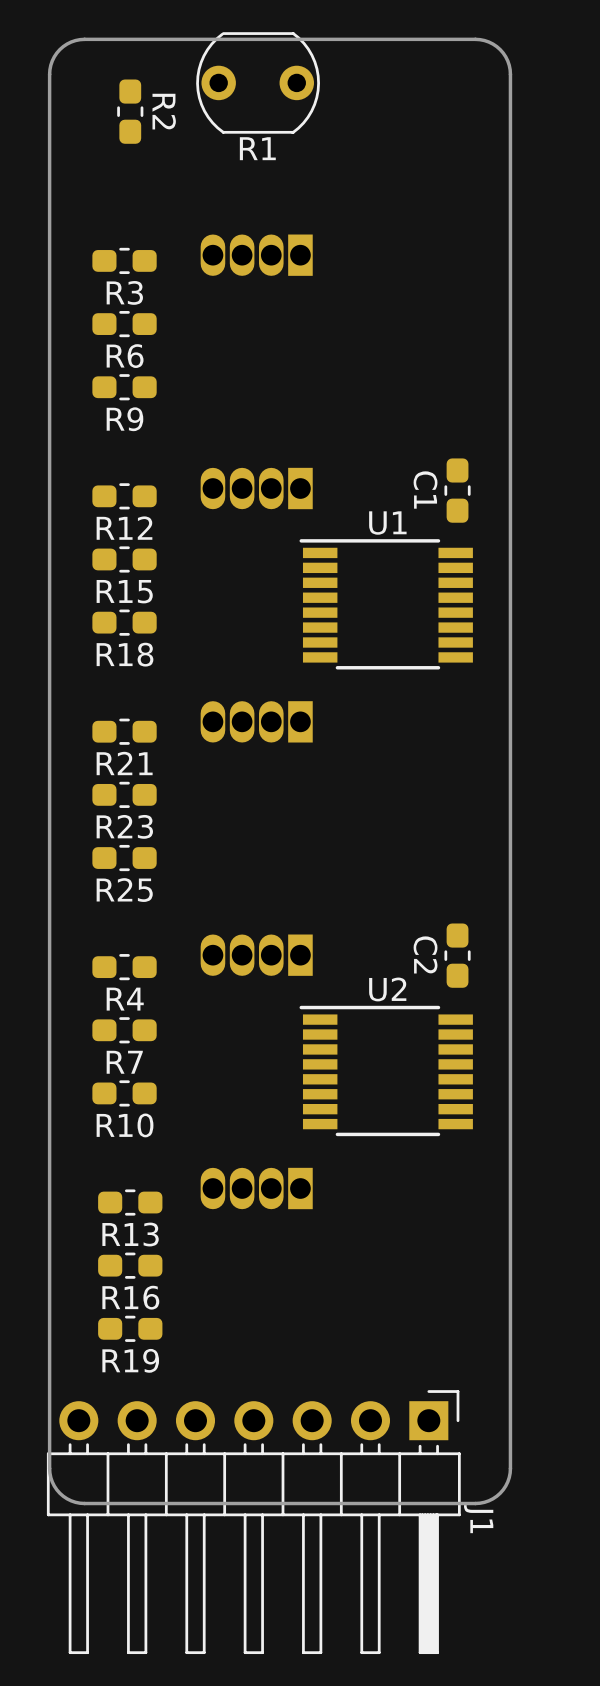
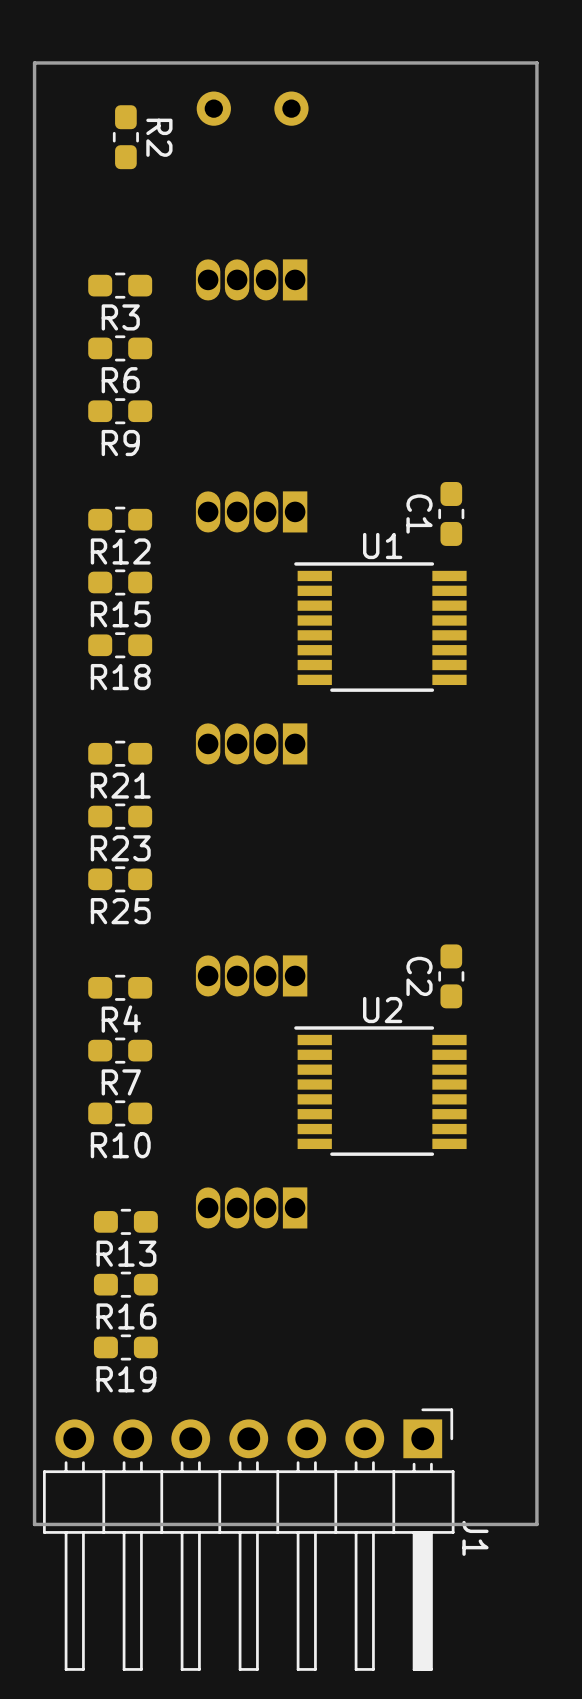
board edge: (475, 39) (84, 39) (71, 42) (63, 46) (54, 56) (50, 65) (49, 1468) (52, 1481) (56, 1489) (63, 1496) (75, 1502) (475, 1503) (488, 1500) (496, 1496) (505, 1486) (509, 1477) (510, 74) (507, 60) (500, 49) (488, 42) (475, 39) -> (536, 62) (536, 1524) (34, 1524) (34, 62) (536, 62)
R1 side: bottom (258, 83) -> top (252, 108)

